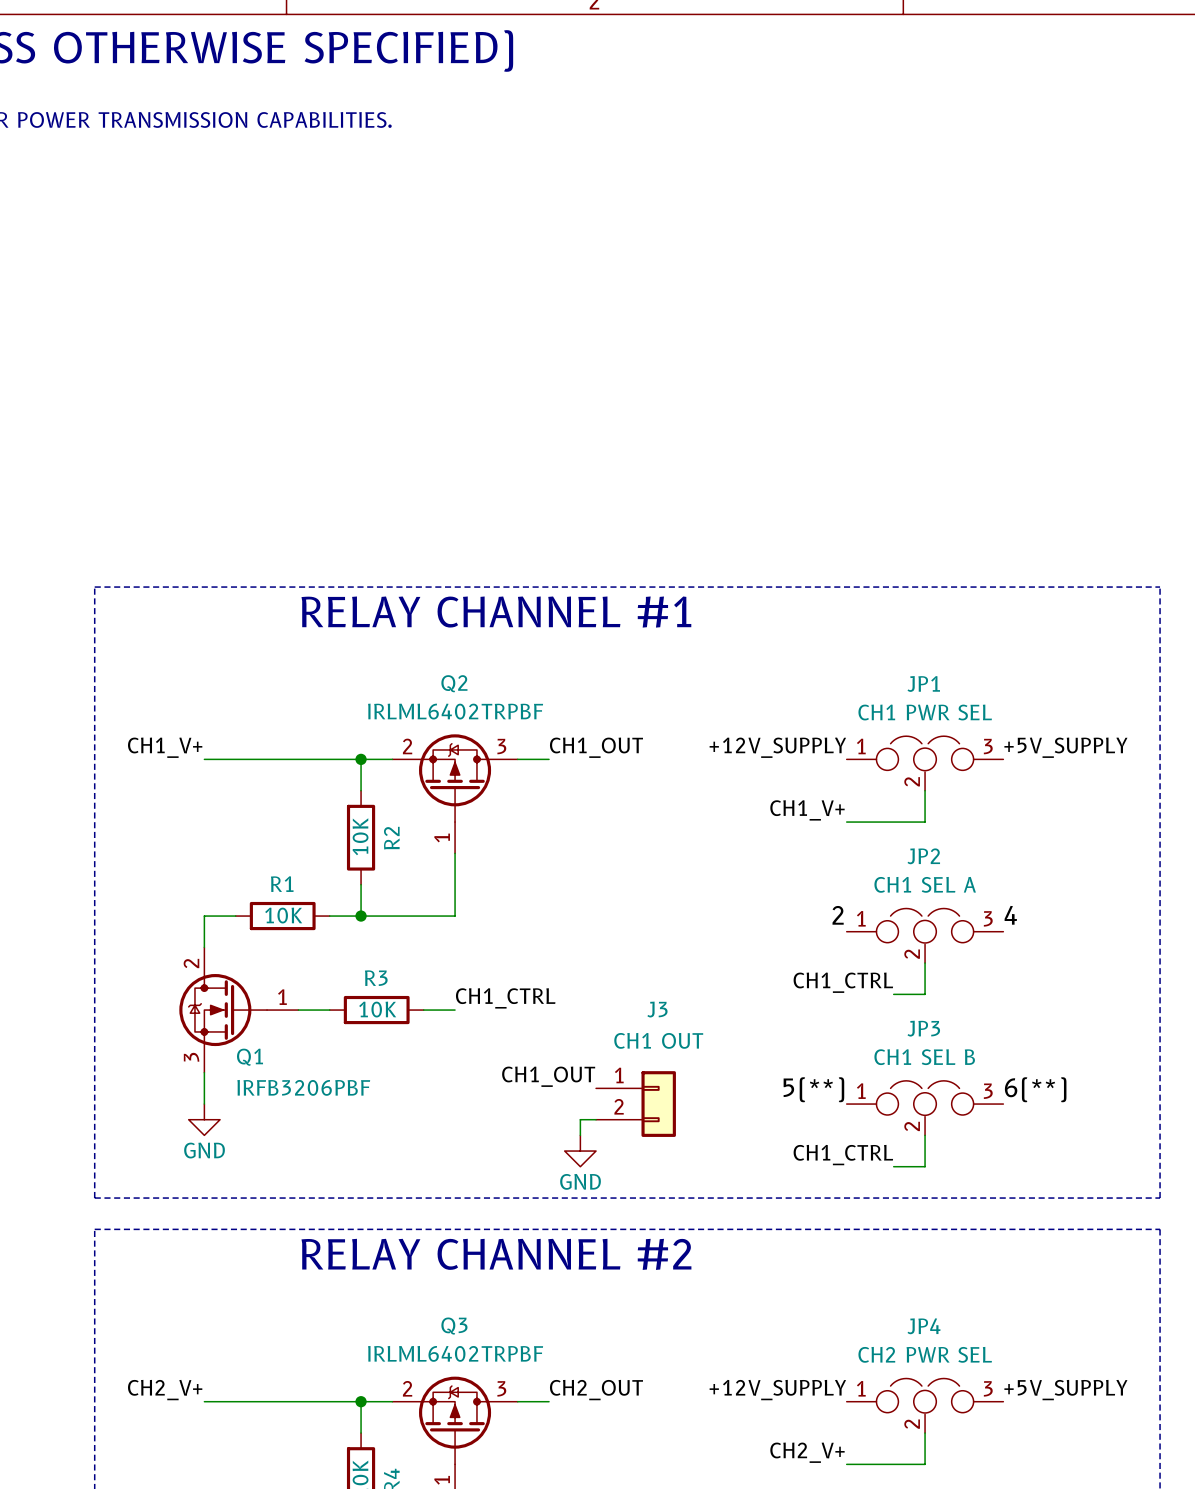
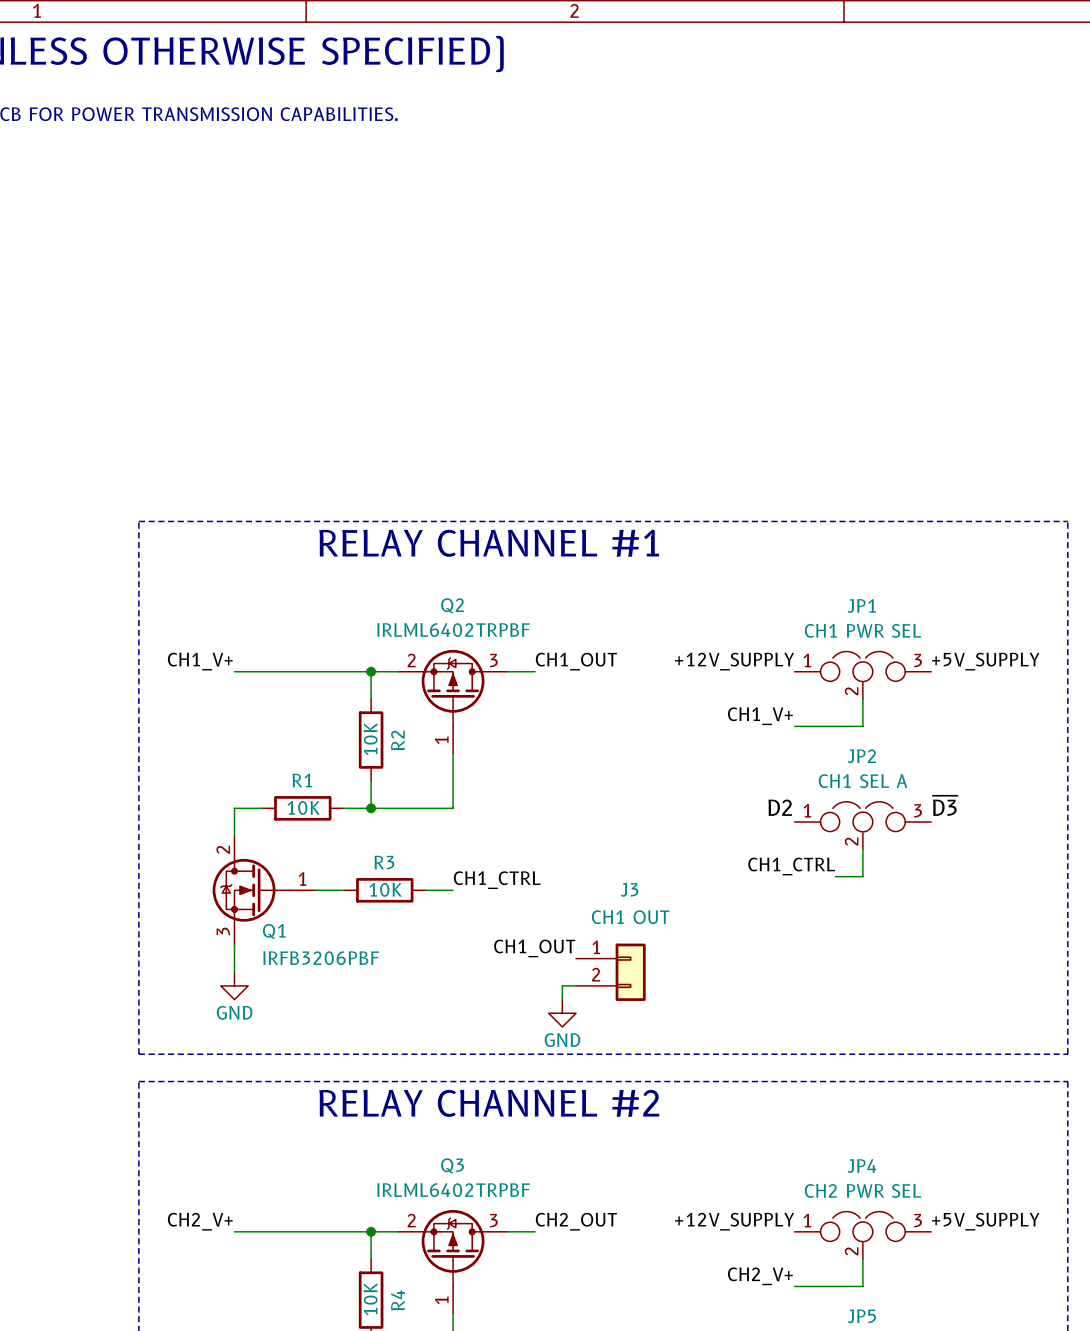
label: 2 (838, 915) -> D2 (780, 807)
label: 4 (1010, 915) -> ~{D3} (945, 805)
label: 5(**) (813, 1089) -> none
label: 6(**) (1035, 1089) -> none
JP3: CH1 SEL B (925, 1108) -> none
wire: (925, 1135) (925, 1166) (893, 1166) -> none
label: CH1_CTRL (843, 1155) -> none

